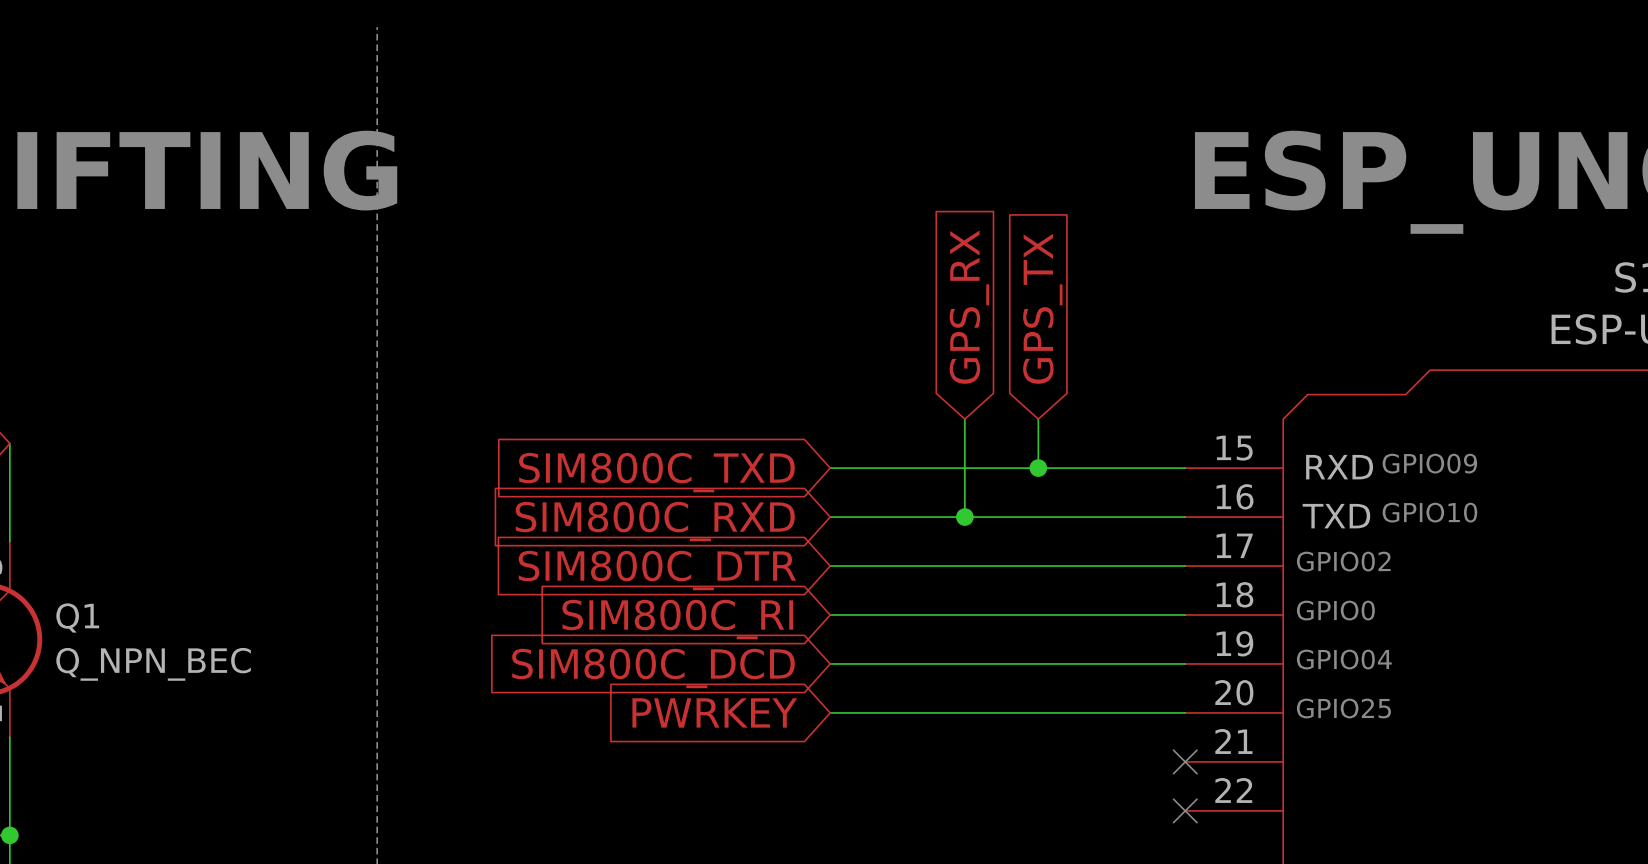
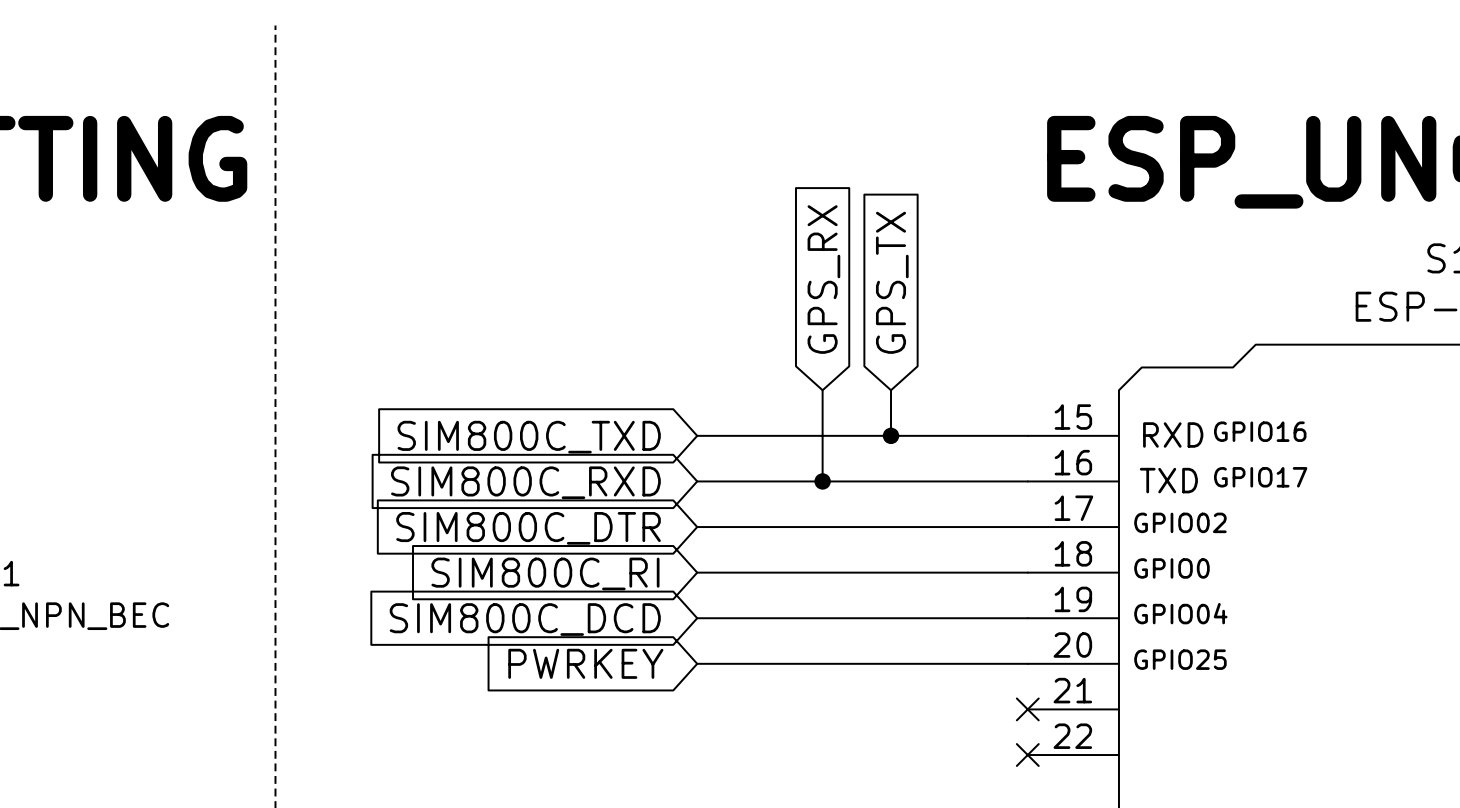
text: GPIO09 (1429, 463) -> GPIO16 (1260, 431)
text: GPIO10 (1429, 512) -> GPIO17 (1260, 477)

